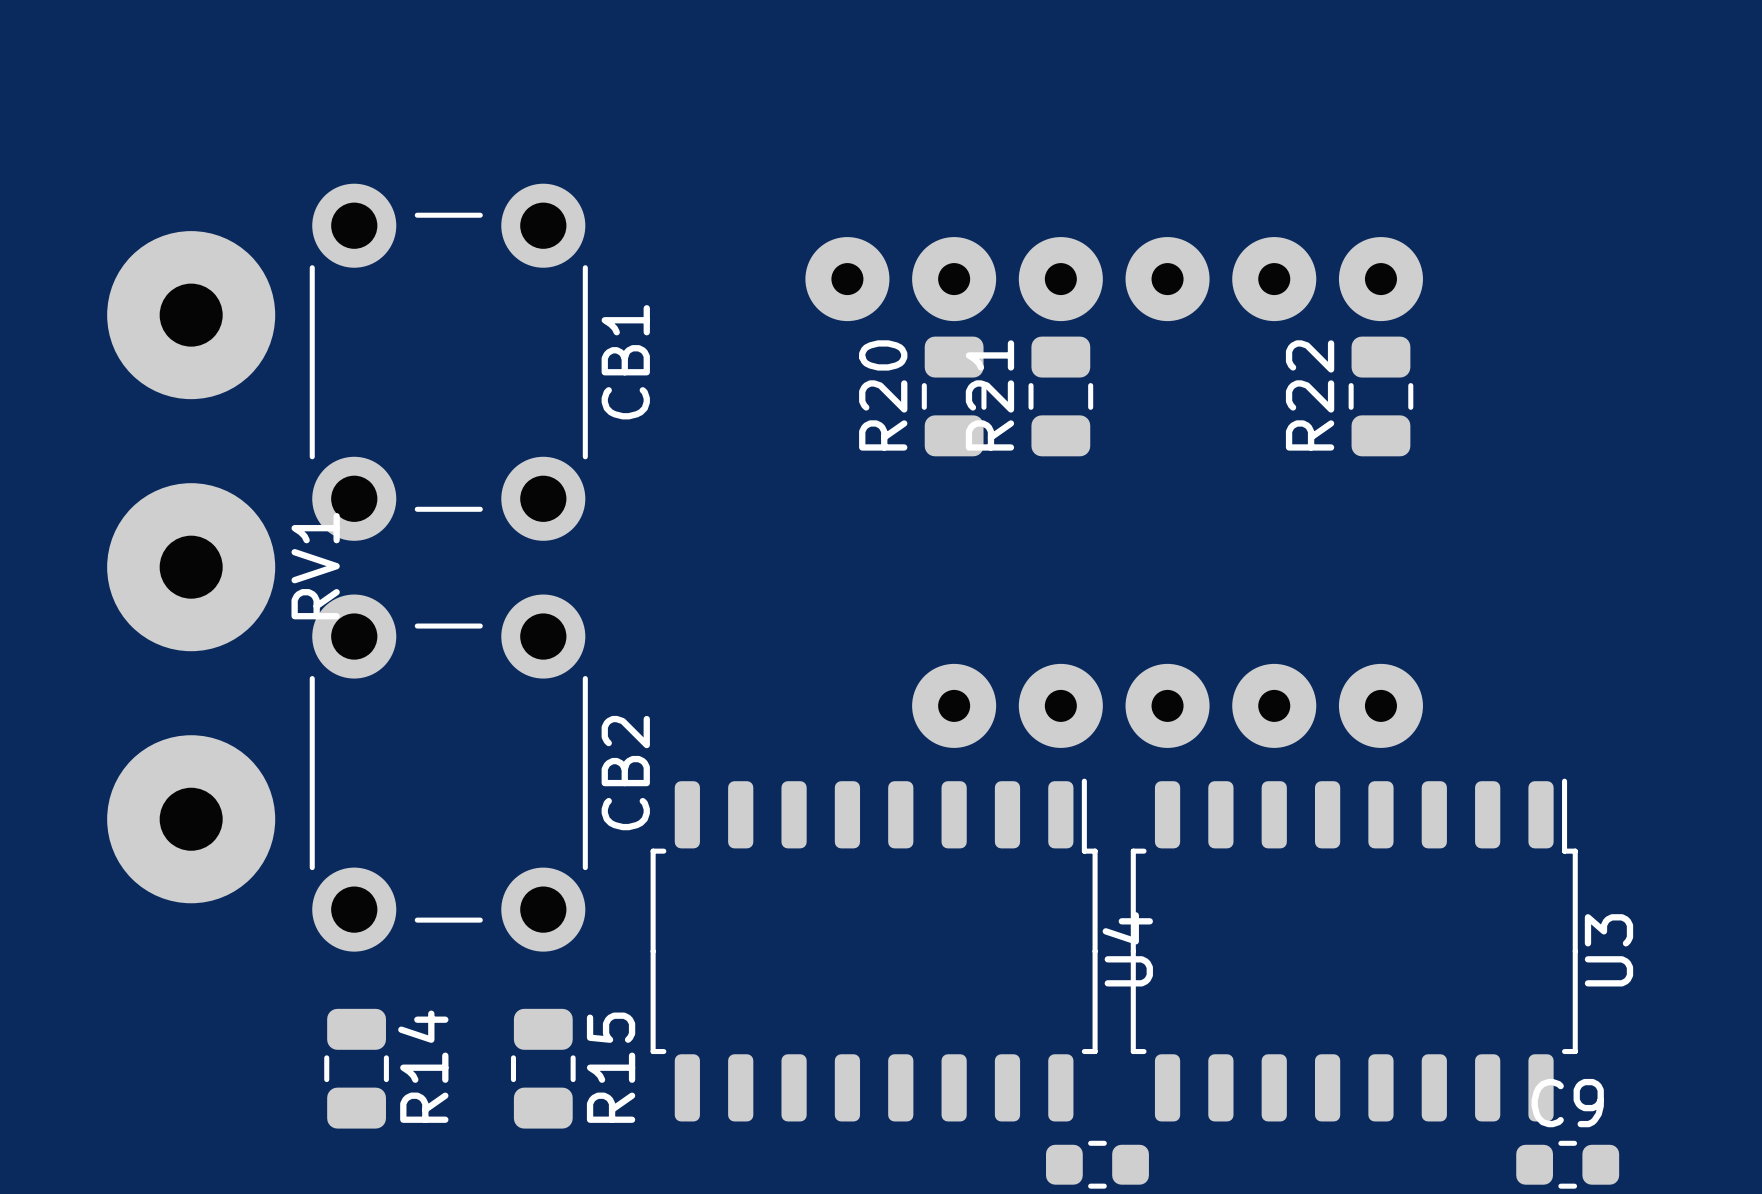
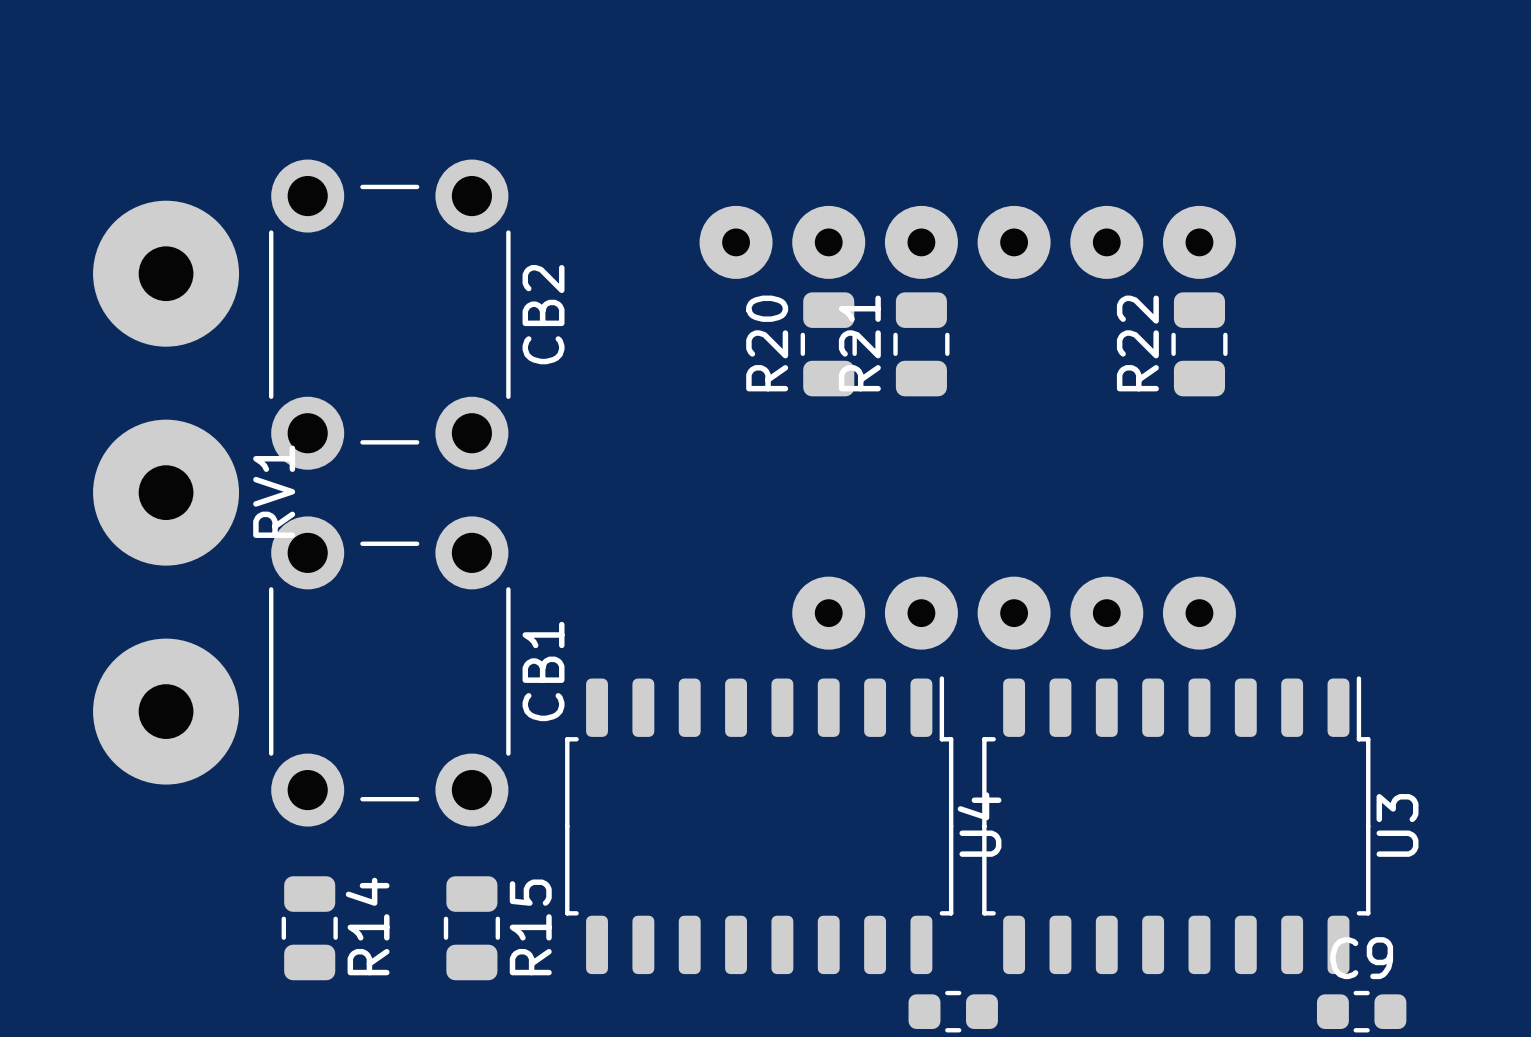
CB1 name: CB1 (625, 362) -> CB2 (543, 314)
CB2 name: CB2 (625, 773) -> CB1 (543, 671)

